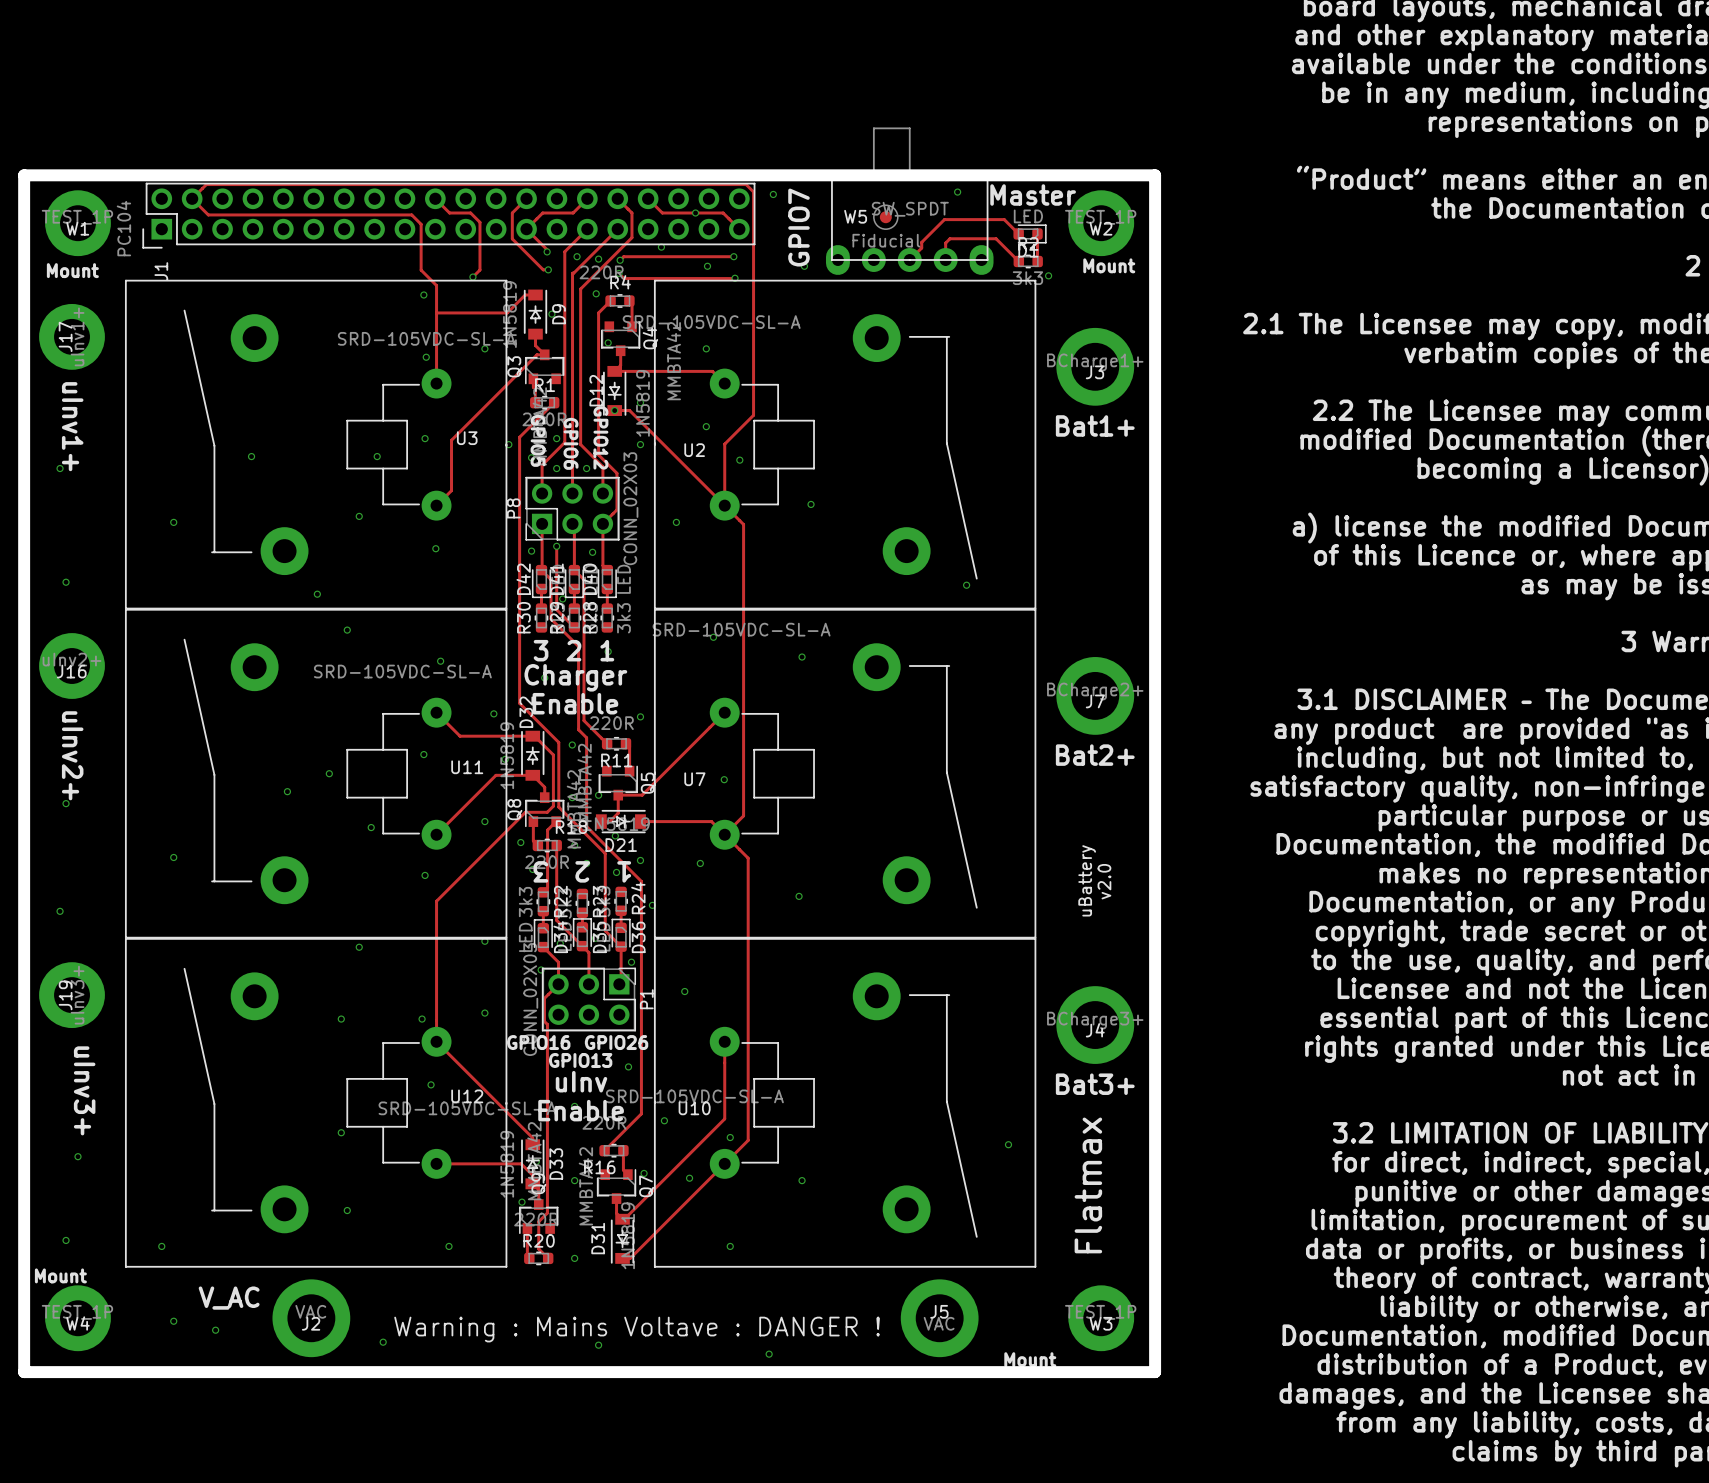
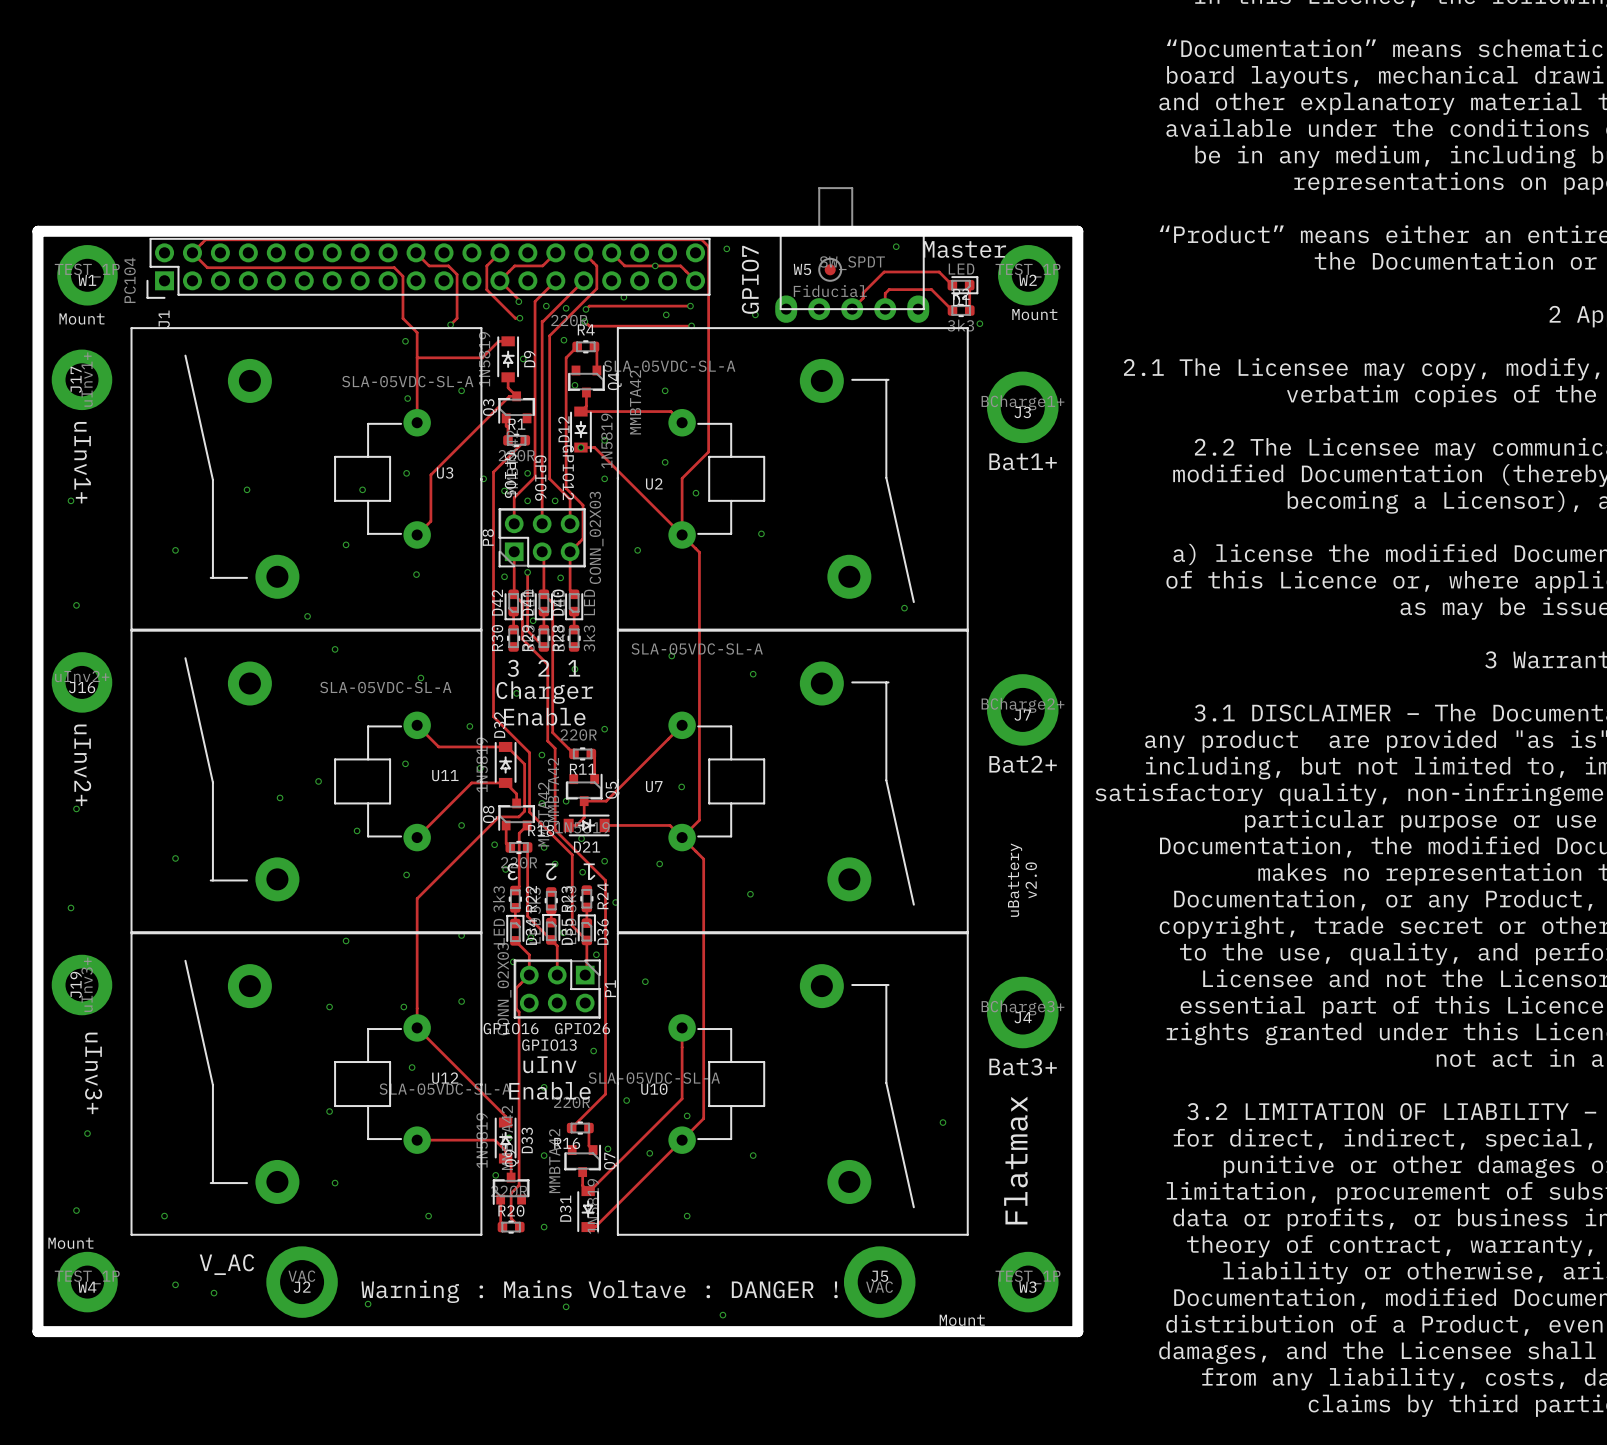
U2 value: SRD-105VDC-SL-A (711, 322) -> SLA-05VDC-SL-A (669, 366)
U3 value: SRD-105VDC-SL-A (426, 338) -> SLA-05VDC-SL-A (407, 381)
U7 value: SRD-105VDC-SL-A (741, 629) -> SLA-05VDC-SL-A (697, 648)
U11 value: SRD-105VDC-SL-A (402, 671) -> SLA-05VDC-SL-A (385, 687)
U10 value: SRD-105VDC-SL-A (694, 1096) -> SLA-05VDC-SL-A (654, 1078)
U12 value: SRD-105VDC-SL-A (467, 1108) -> SLA-05VDC-SL-A (445, 1089)

